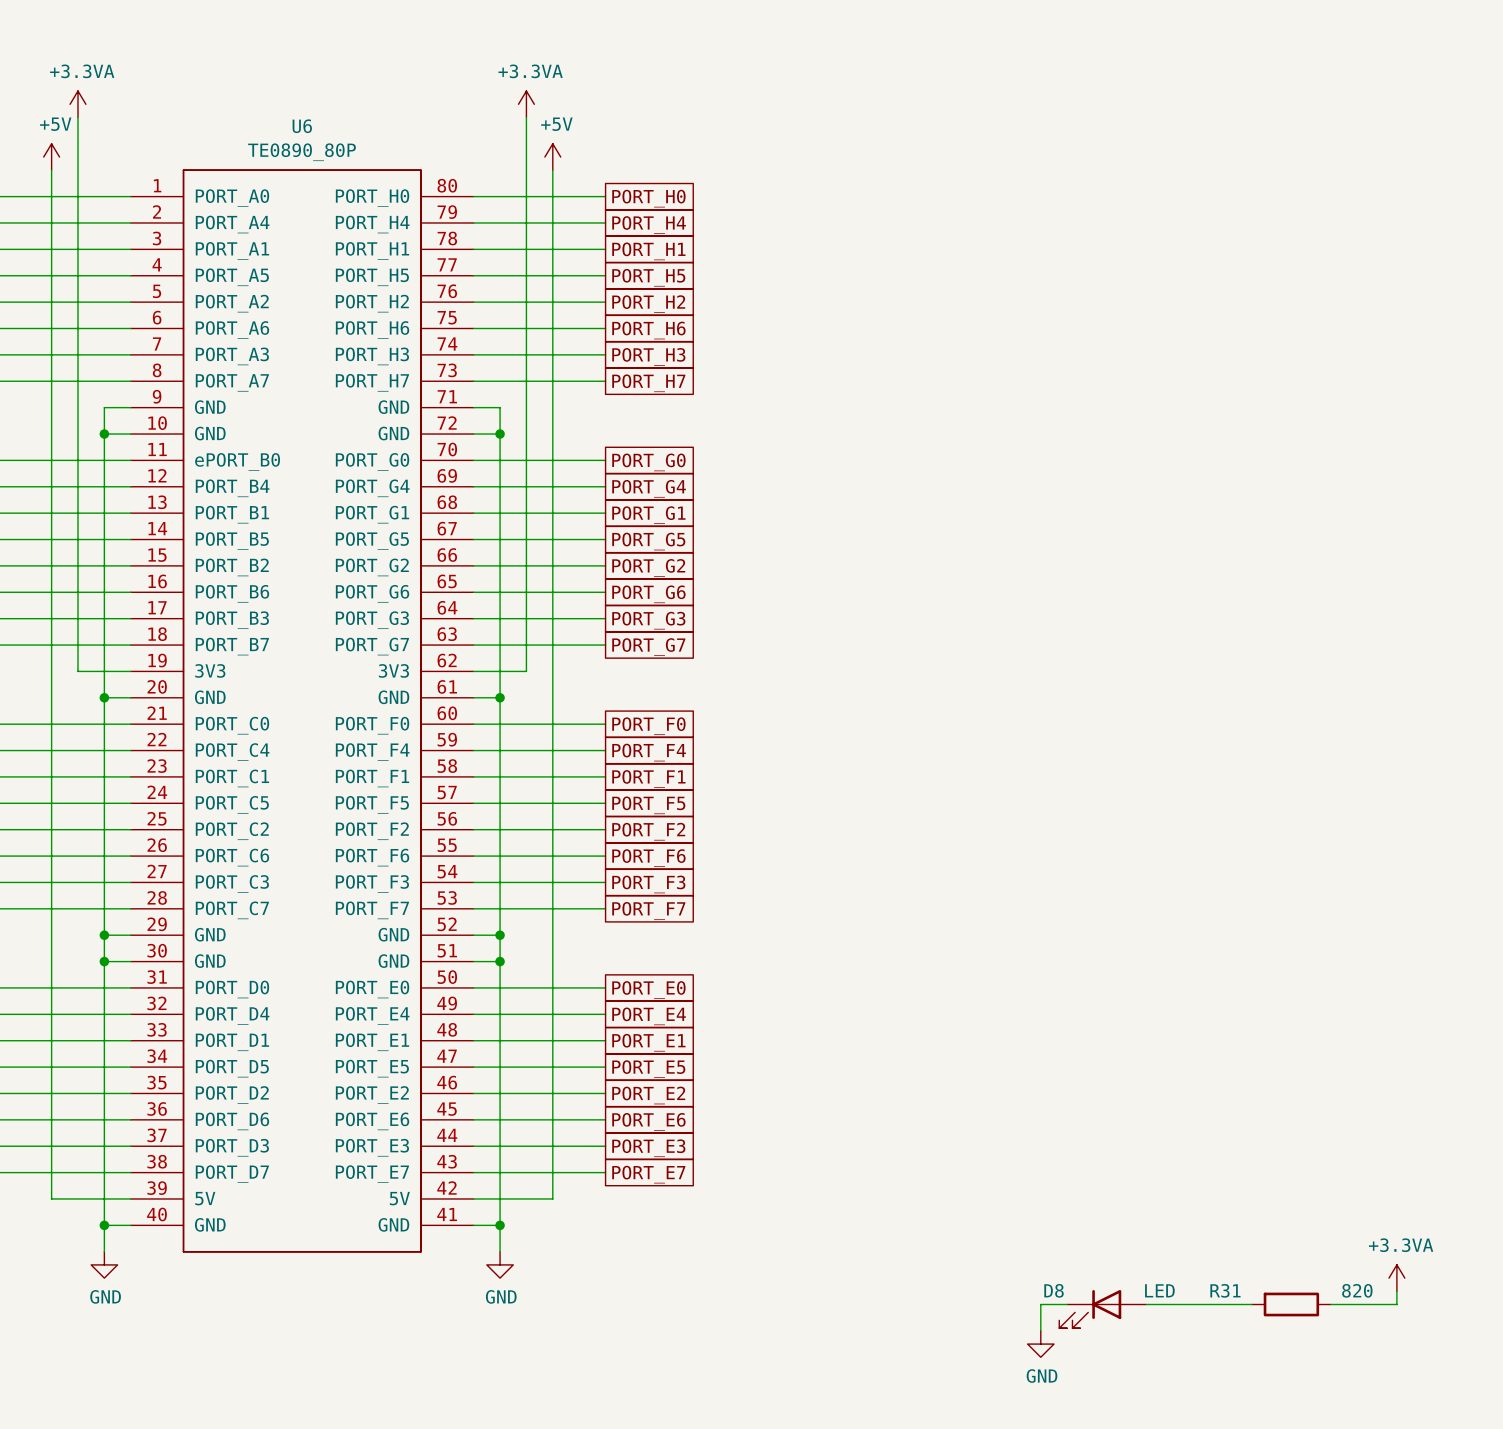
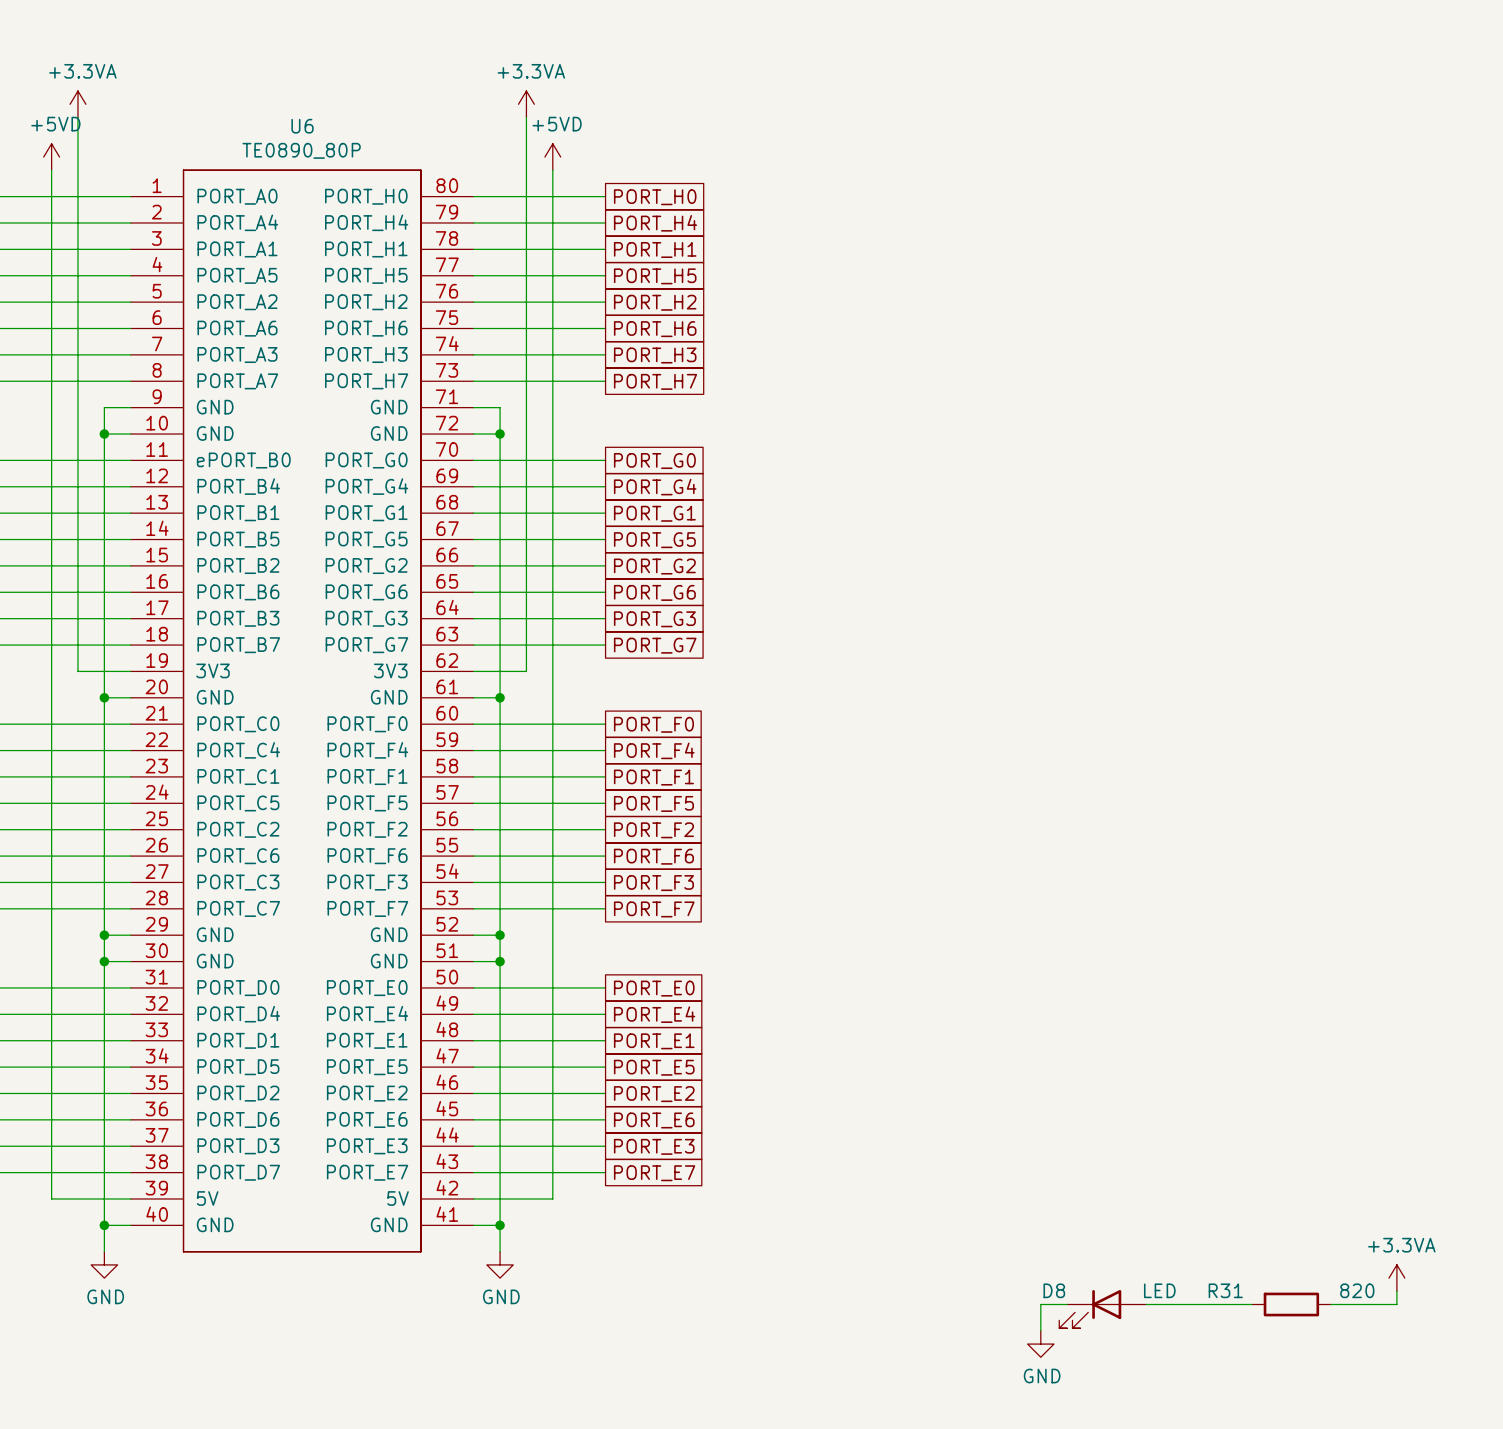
power symbol: +5V (51, 157) -> +5VD (51, 157)
power symbol: +5V (552, 157) -> +5VD (552, 157)

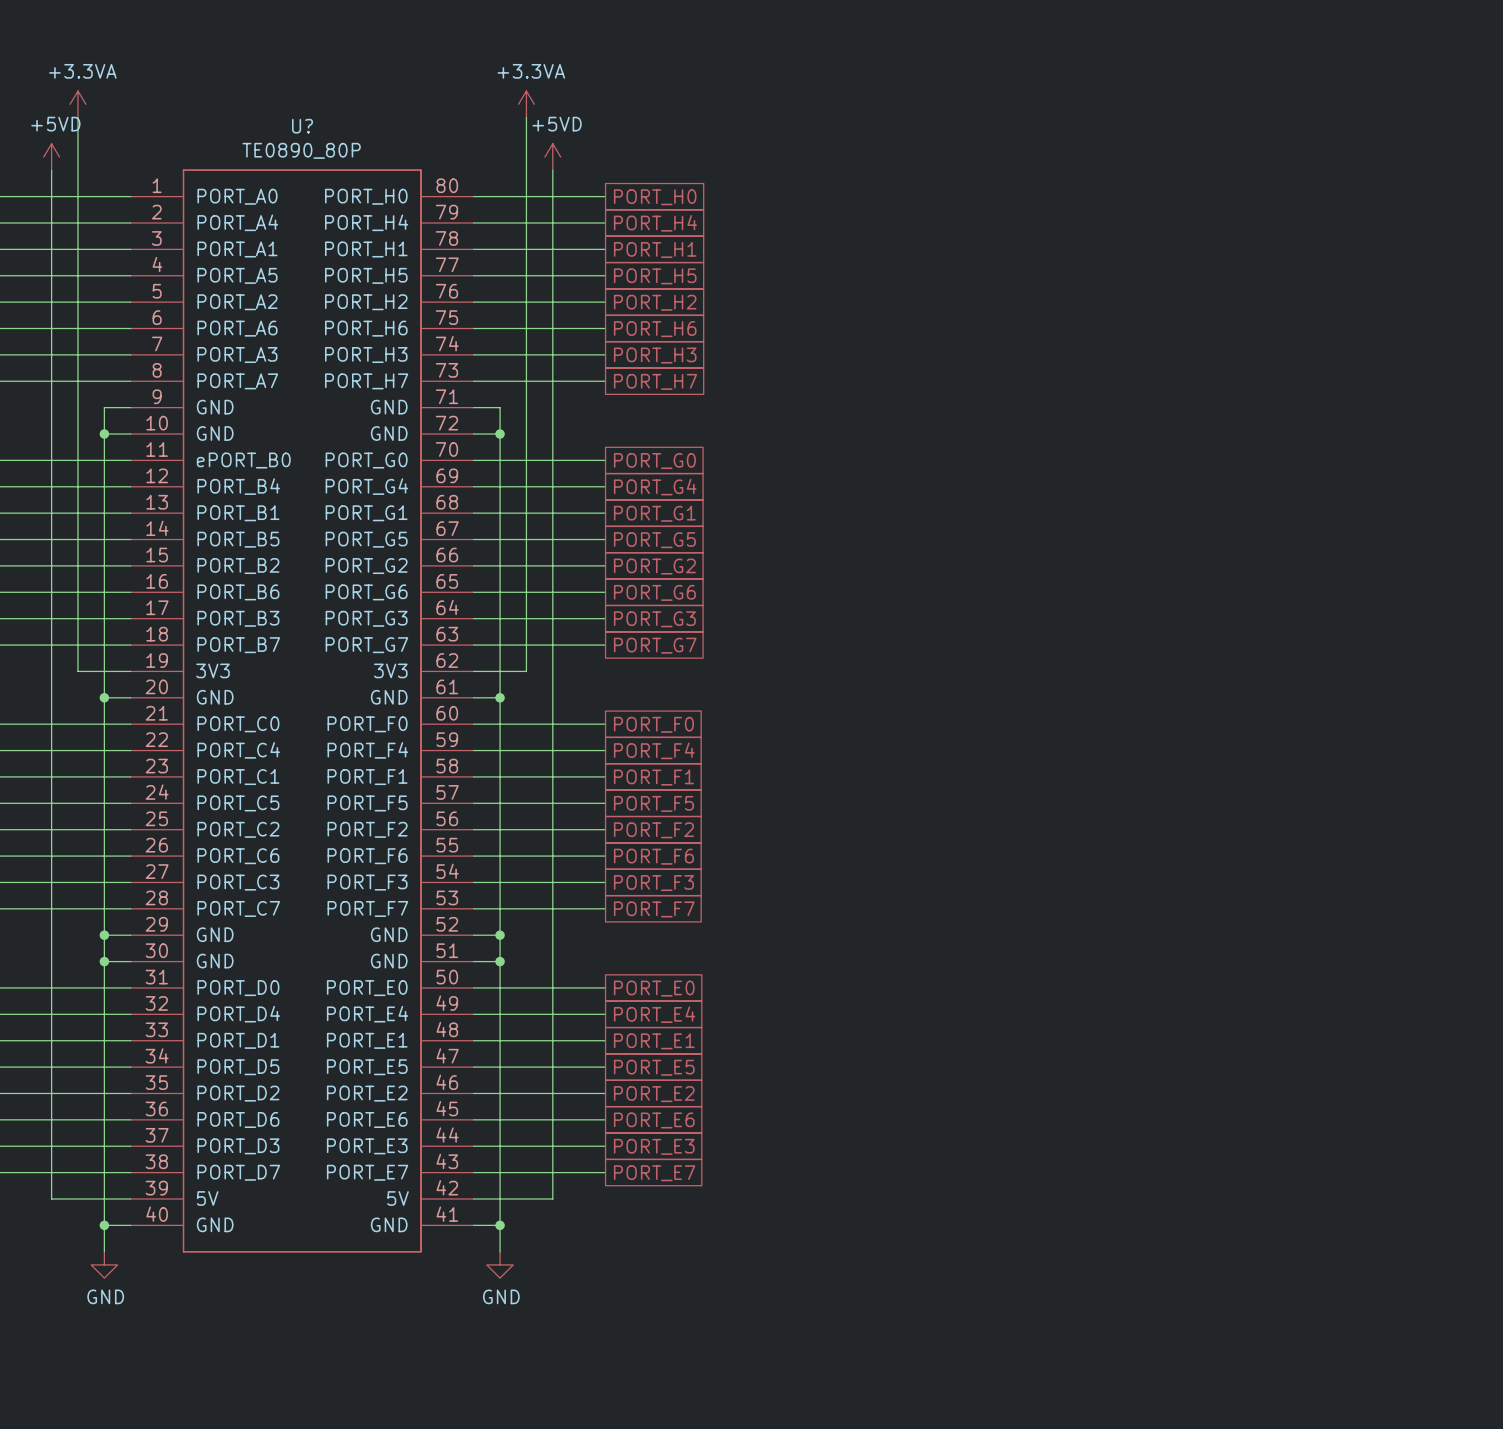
U6 name: U6 (302, 126) -> U? (302, 126)
power symbol: +3.3VA (1396, 1278) -> none
wire: (1396, 1291) (1396, 1304) (1330, 1304) -> none
wire: (1067, 1304) (1040, 1304) (1040, 1330) -> none
wire: (1146, 1304) (1251, 1304) -> none
R31: 820 (1291, 1304) -> none
D8: LED (1102, 1309) -> none
power symbol: GND (1040, 1344) -> none

